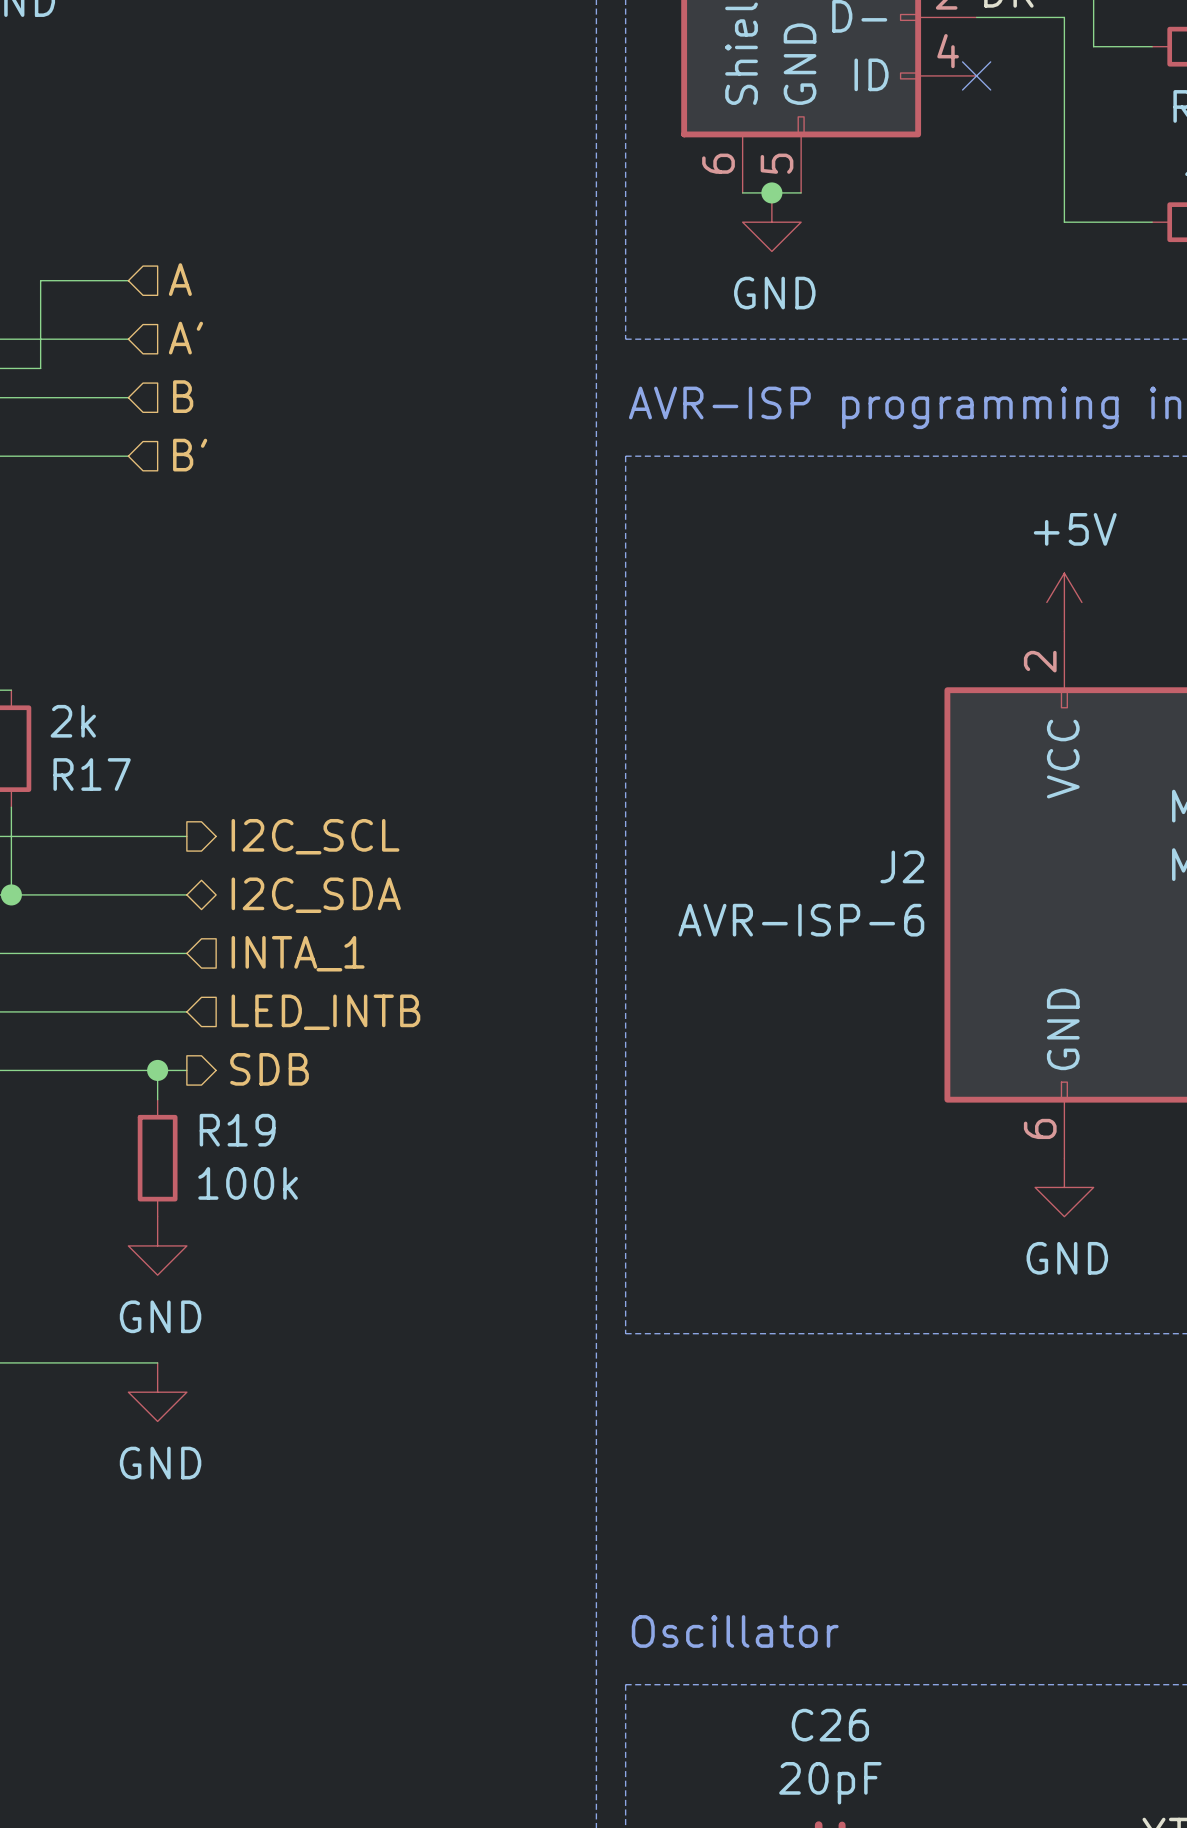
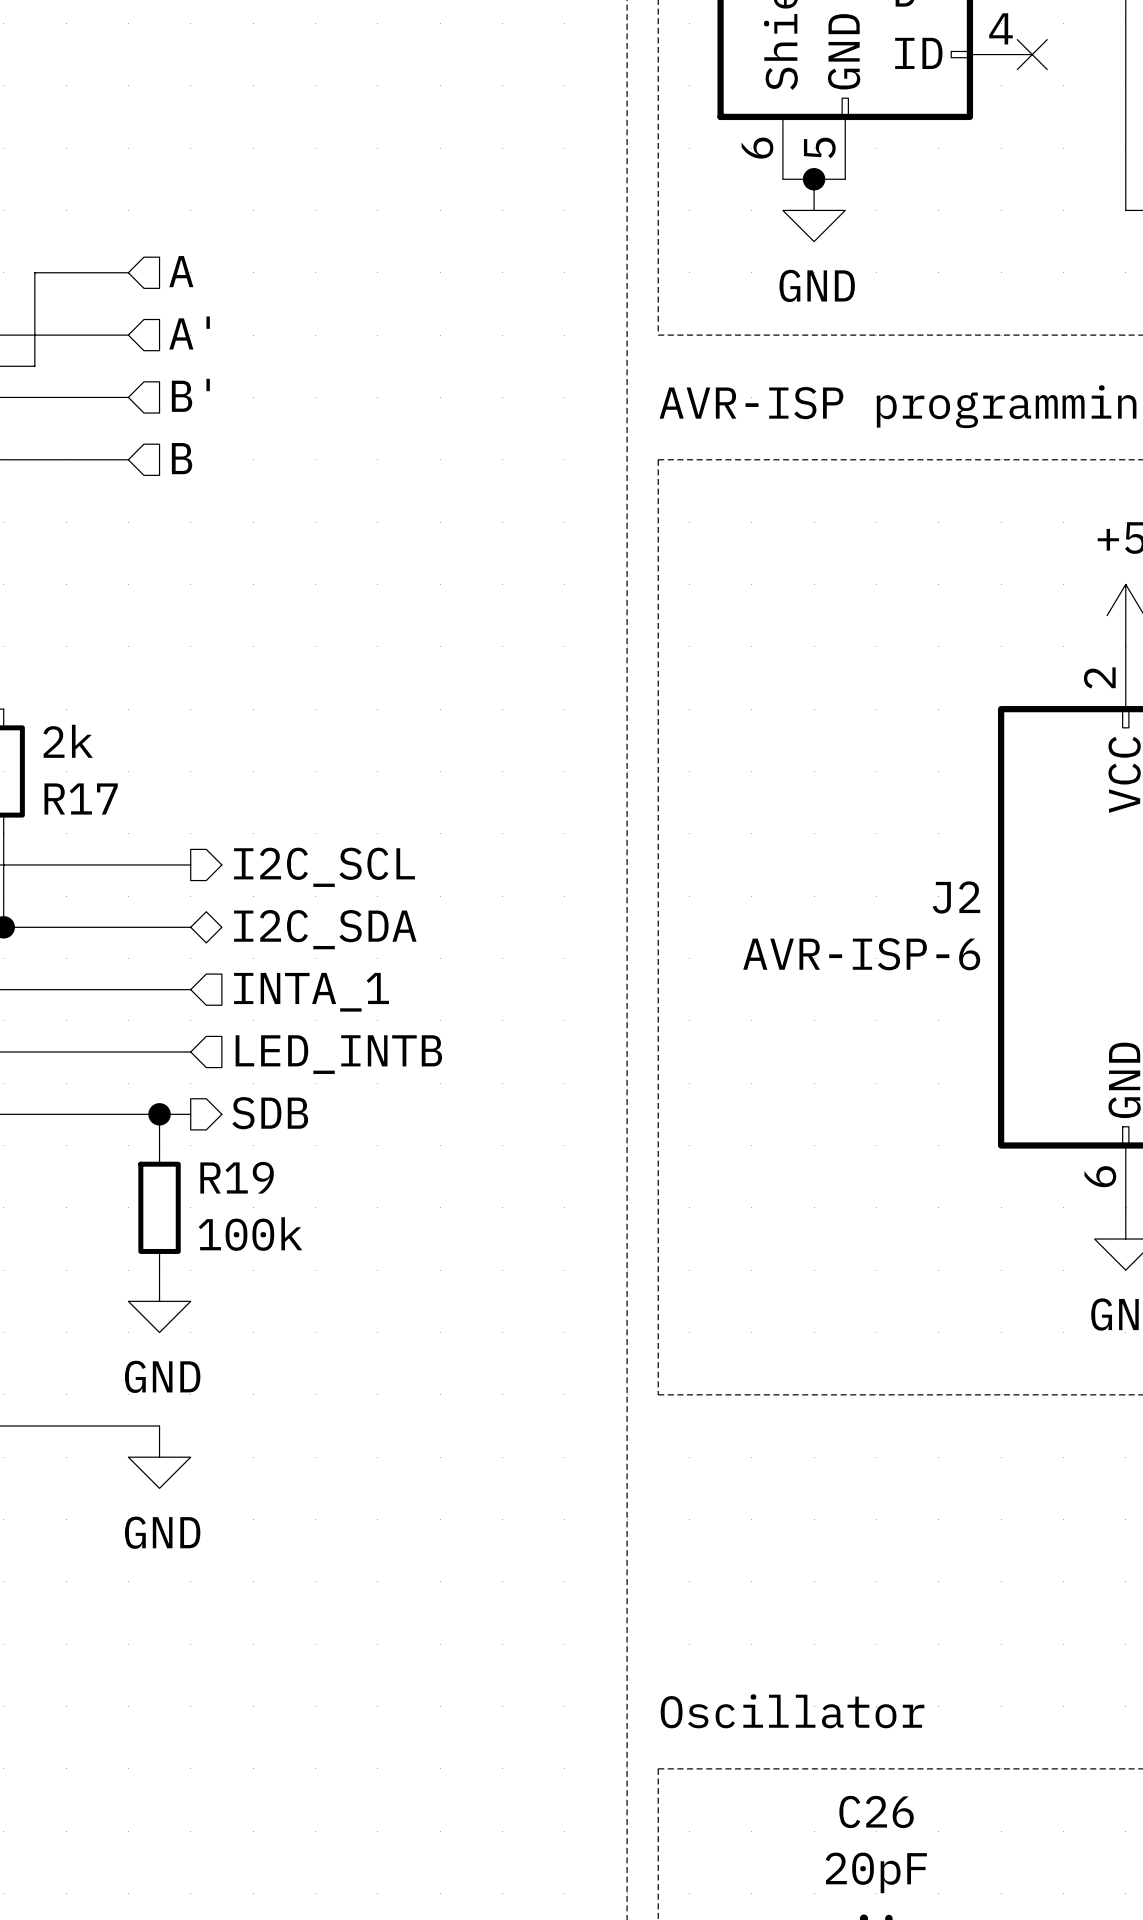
hierarchical label: B (183, 396) -> B' (190, 395)
hierarchical label: B' (190, 455) -> B (182, 458)

